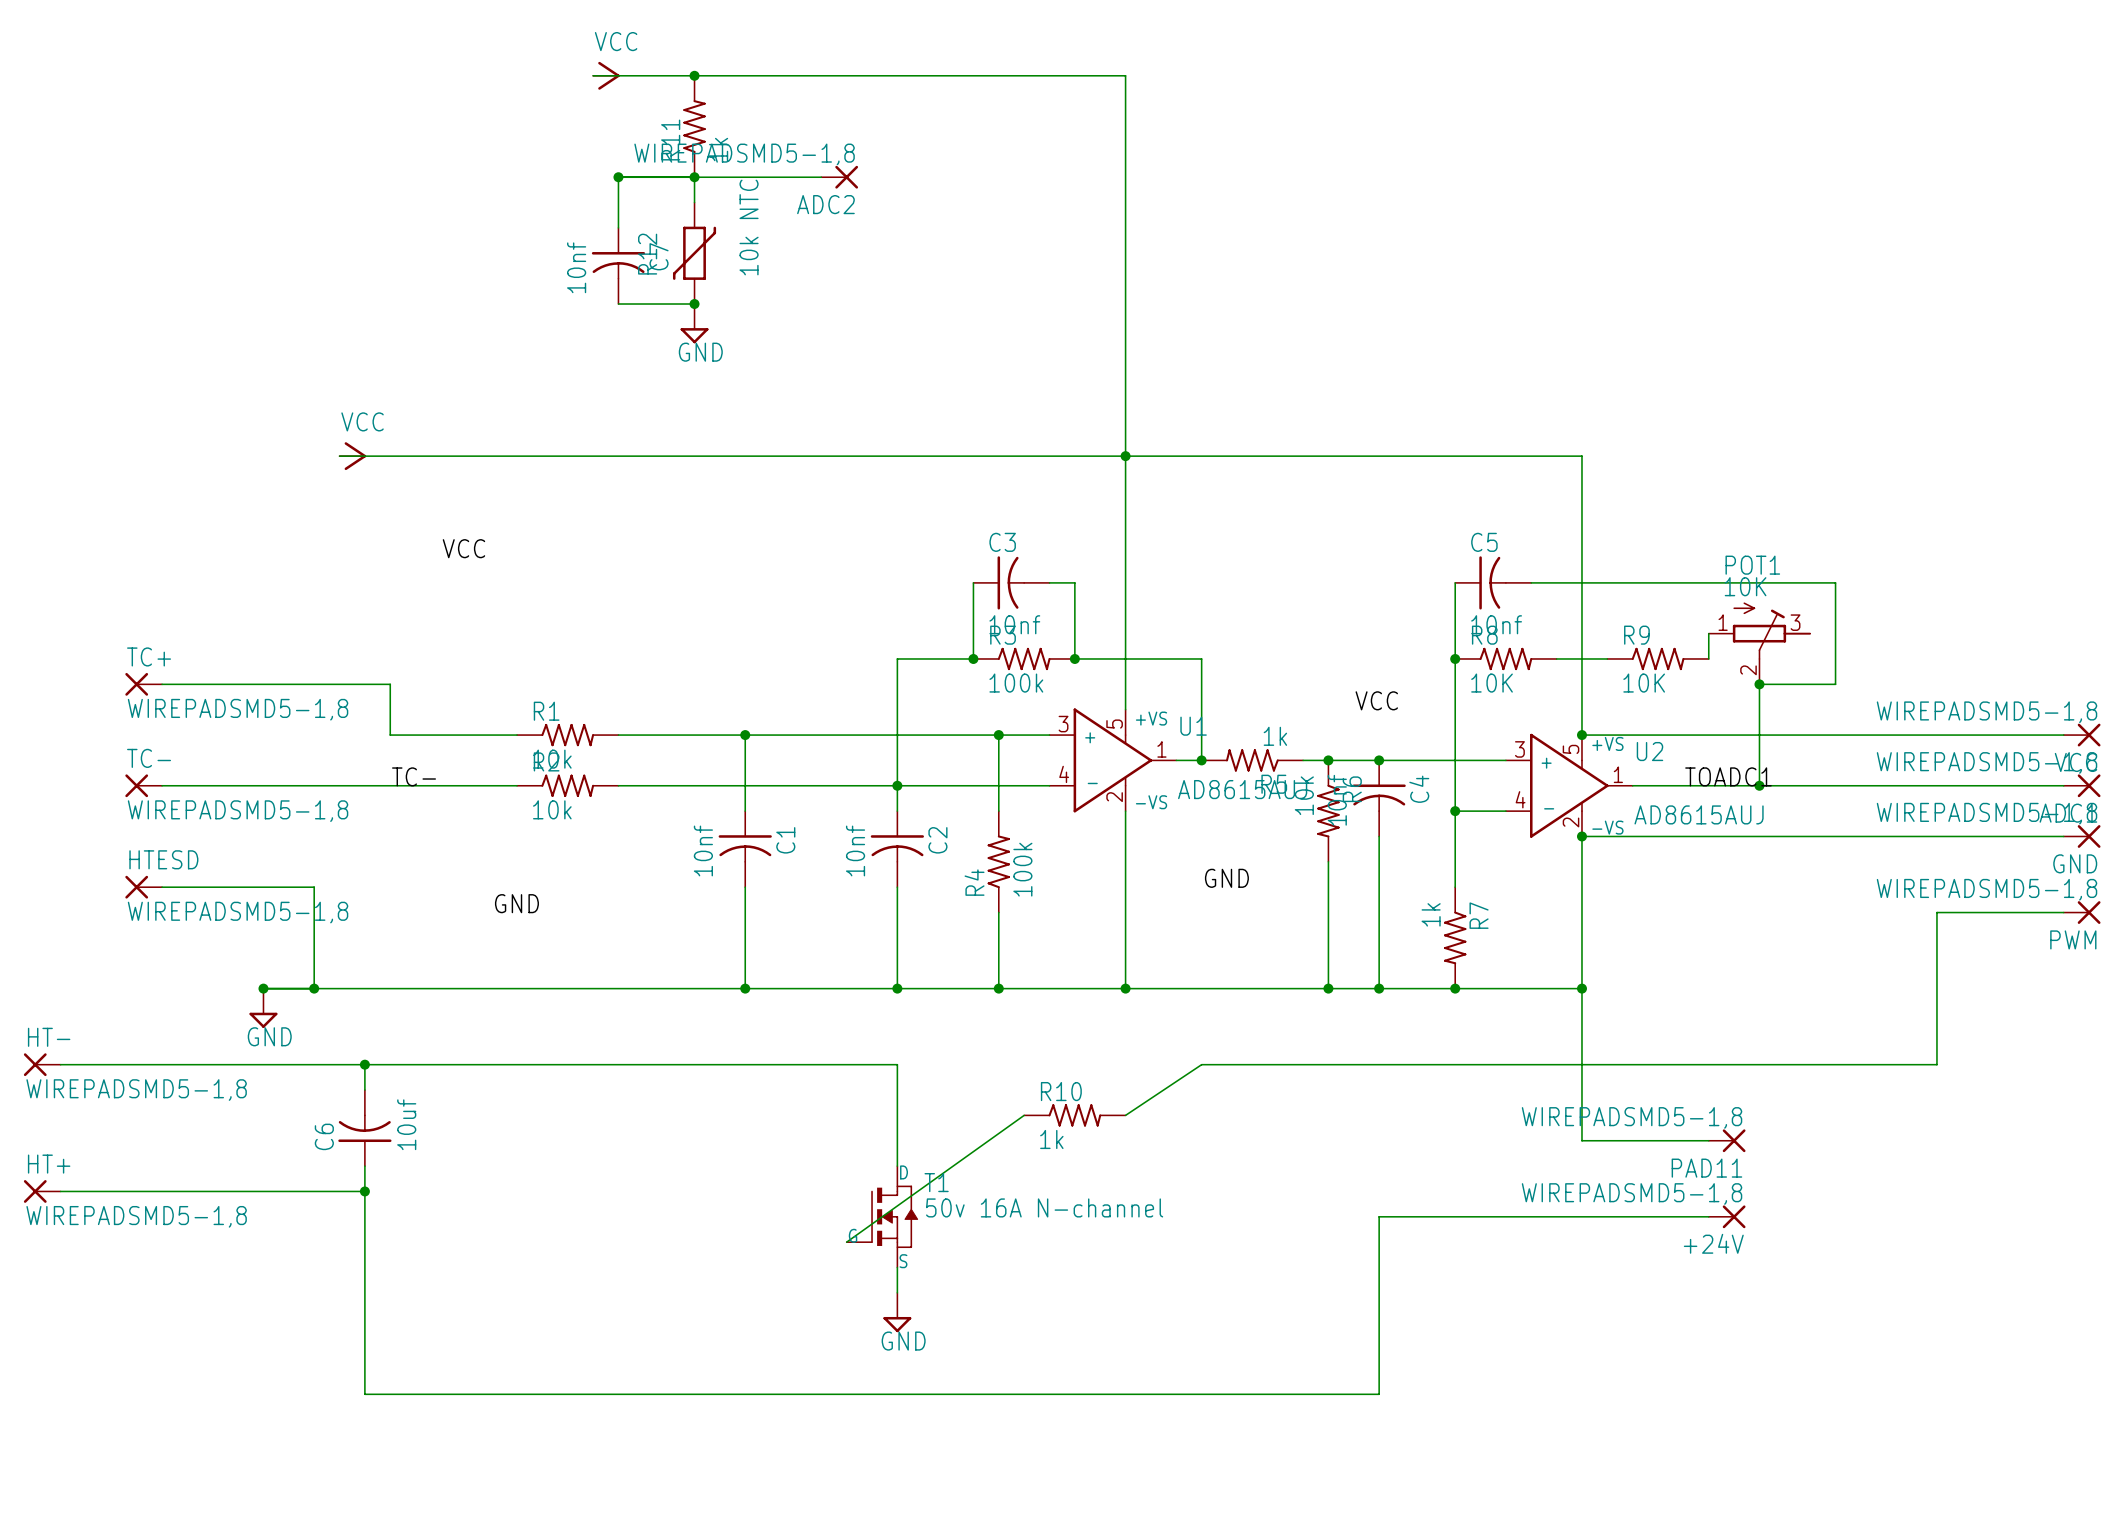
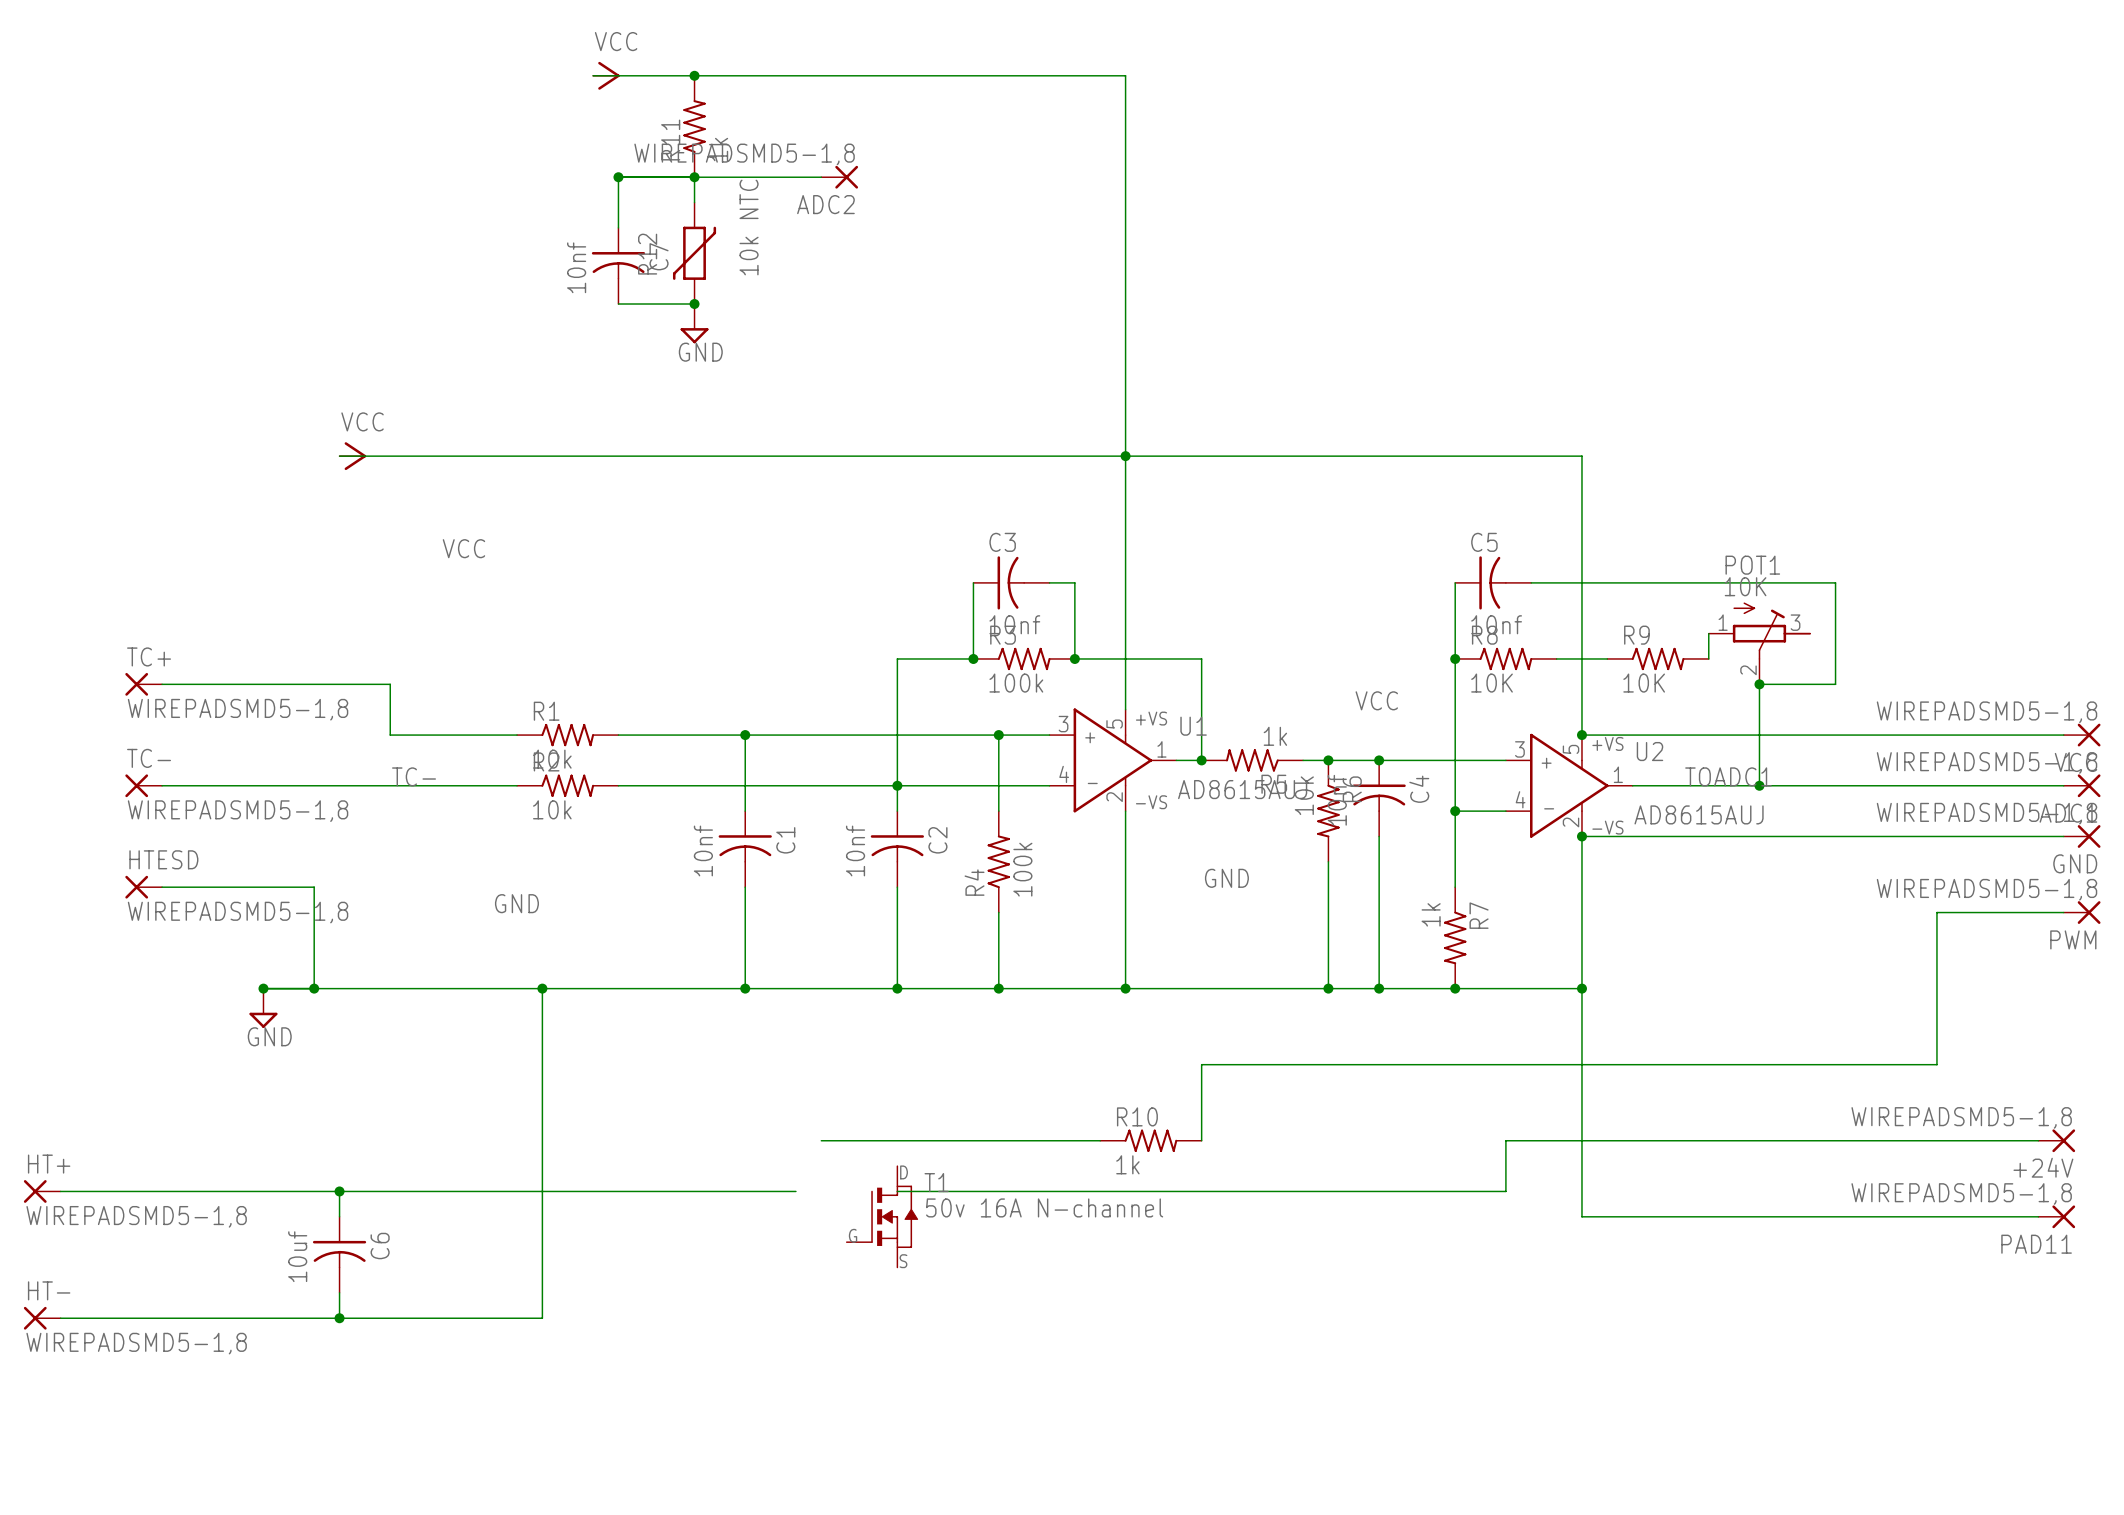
wire: none -> (542, 988) (542, 1318) (60, 1318)
junction: none -> (542, 988)
HT-: WIREPADSMD5-1,8 (42, 1064) -> none
wire: (60, 1064) (897, 1064) (897, 1166) -> none
wire: (364, 1064) (364, 1090) -> (339, 1191) (339, 1216)
junction: (364, 1064) -> none
wire: (1201, 1064) (1125, 1115) -> (1201, 1064) (1201, 1140)
wire: (1024, 1115) (846, 1242) -> none
R10 position: (1074, 1115) -> (1150, 1140)
C6 rotation: 0° (364, 1128) -> 180° (339, 1254)
C6 position: (364, 1128) -> (339, 1254)
wire: none -> (821, 1140) (1100, 1140)
wire: none -> (1708, 1140) (2038, 1140)
PAD11 position: (1727, 1140) -> (2056, 1216)
wire: (364, 1166) (364, 1394) (1379, 1394) (1379, 1216) (1581, 1216) -> (897, 1191) (1505, 1191) (1505, 1140) (1581, 1140) (1581, 1216)
wire: none -> (364, 1191) (795, 1191)
junction position: (364, 1191) -> (339, 1191)
wire: none -> (1708, 1216) (2038, 1216)
+24V position: (1727, 1216) -> (2056, 1140)
wire: (897, 1267) (897, 1292) -> none
wire: none -> (339, 1292) (339, 1318)
power symbol: GND (897, 1312) -> none
HT-: none -> WIREPADSMD5-1,8 (42, 1318)
junction: none -> (339, 1318)

